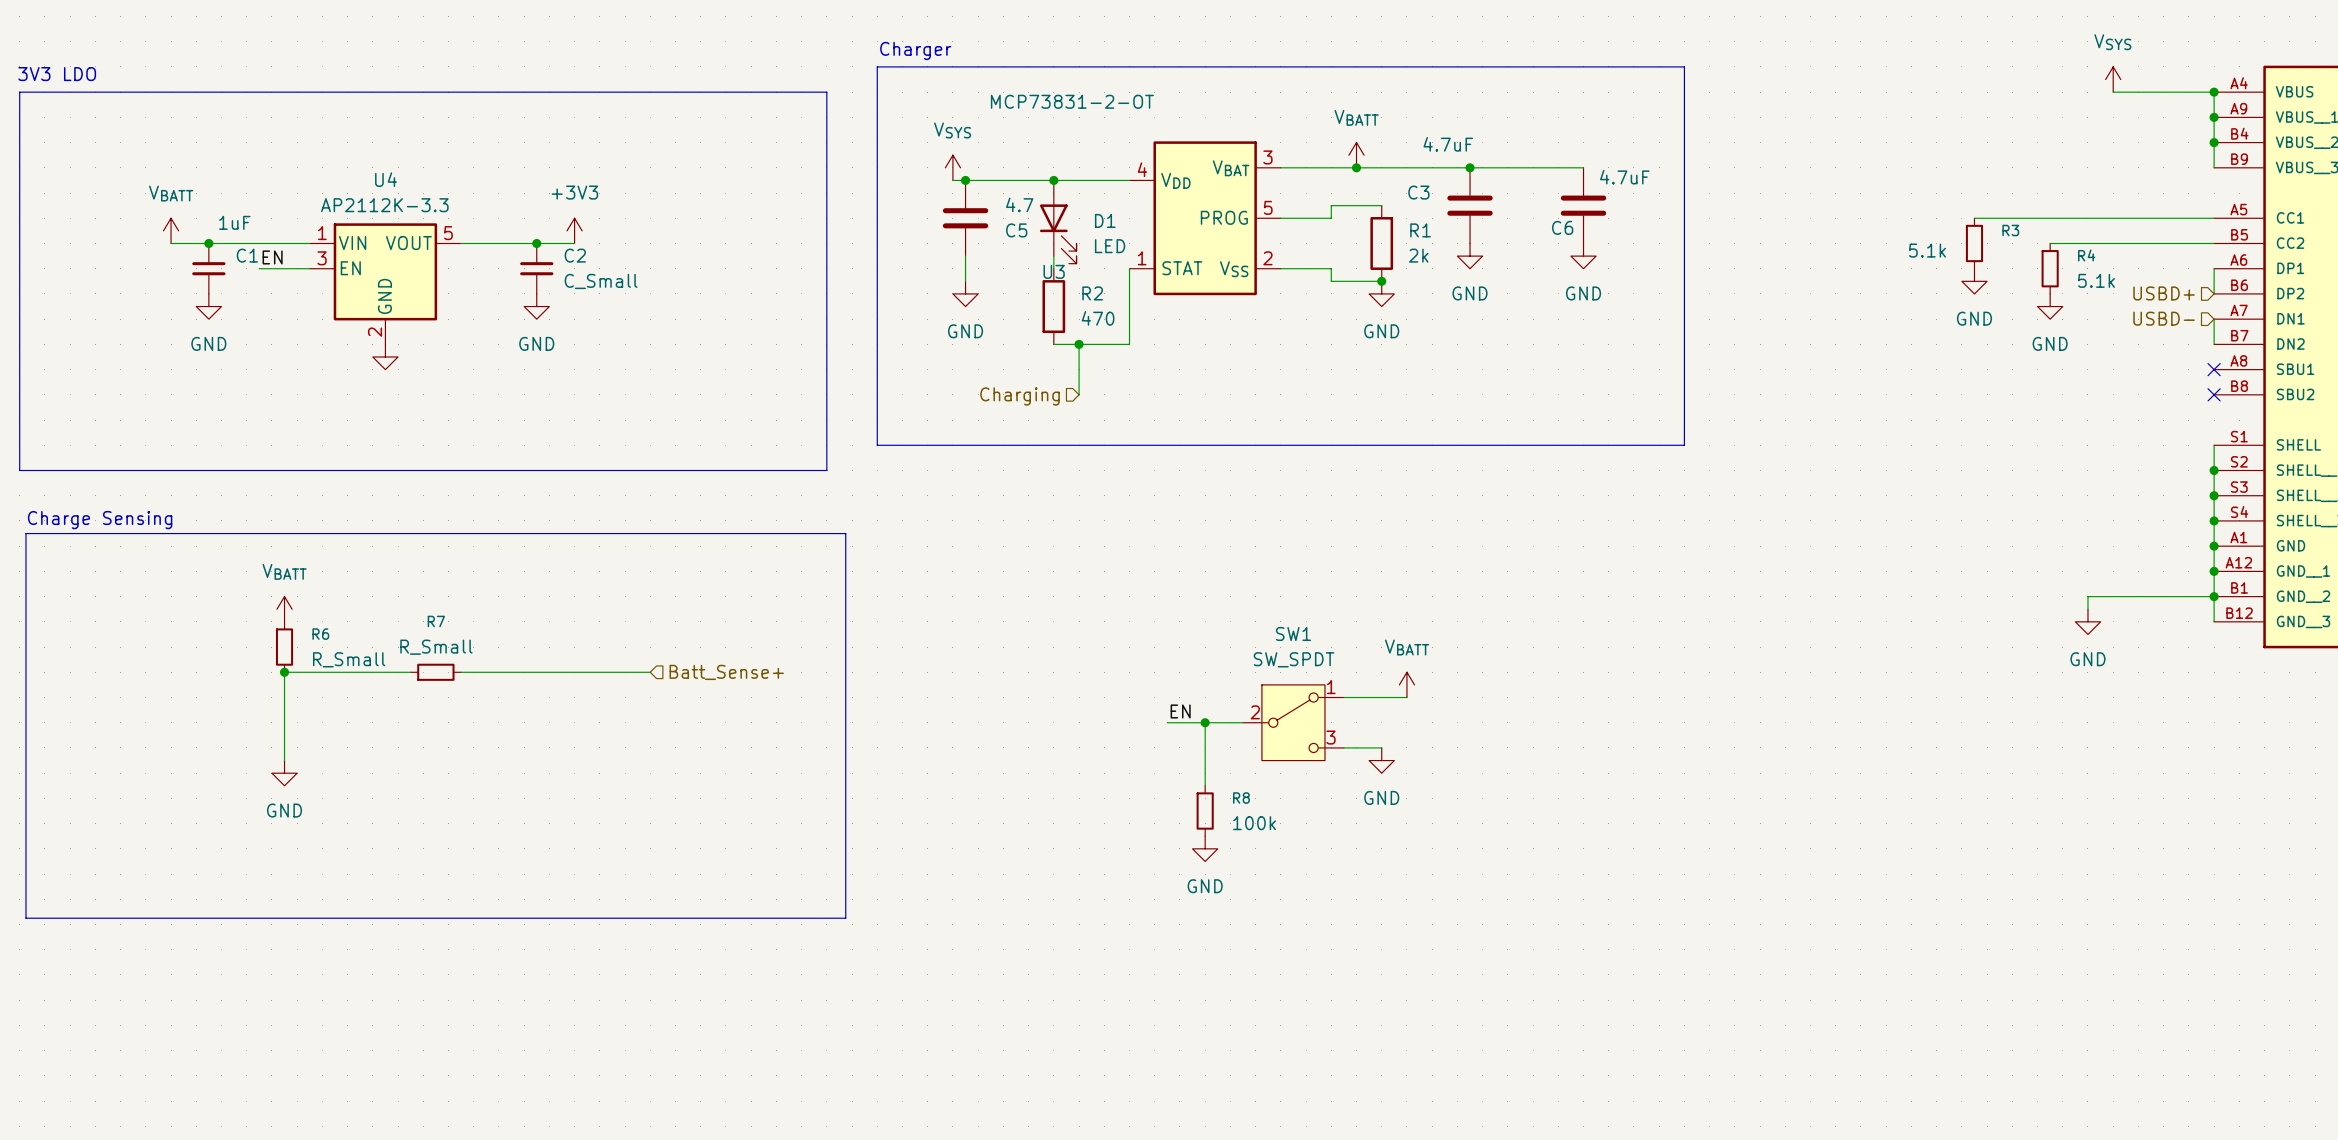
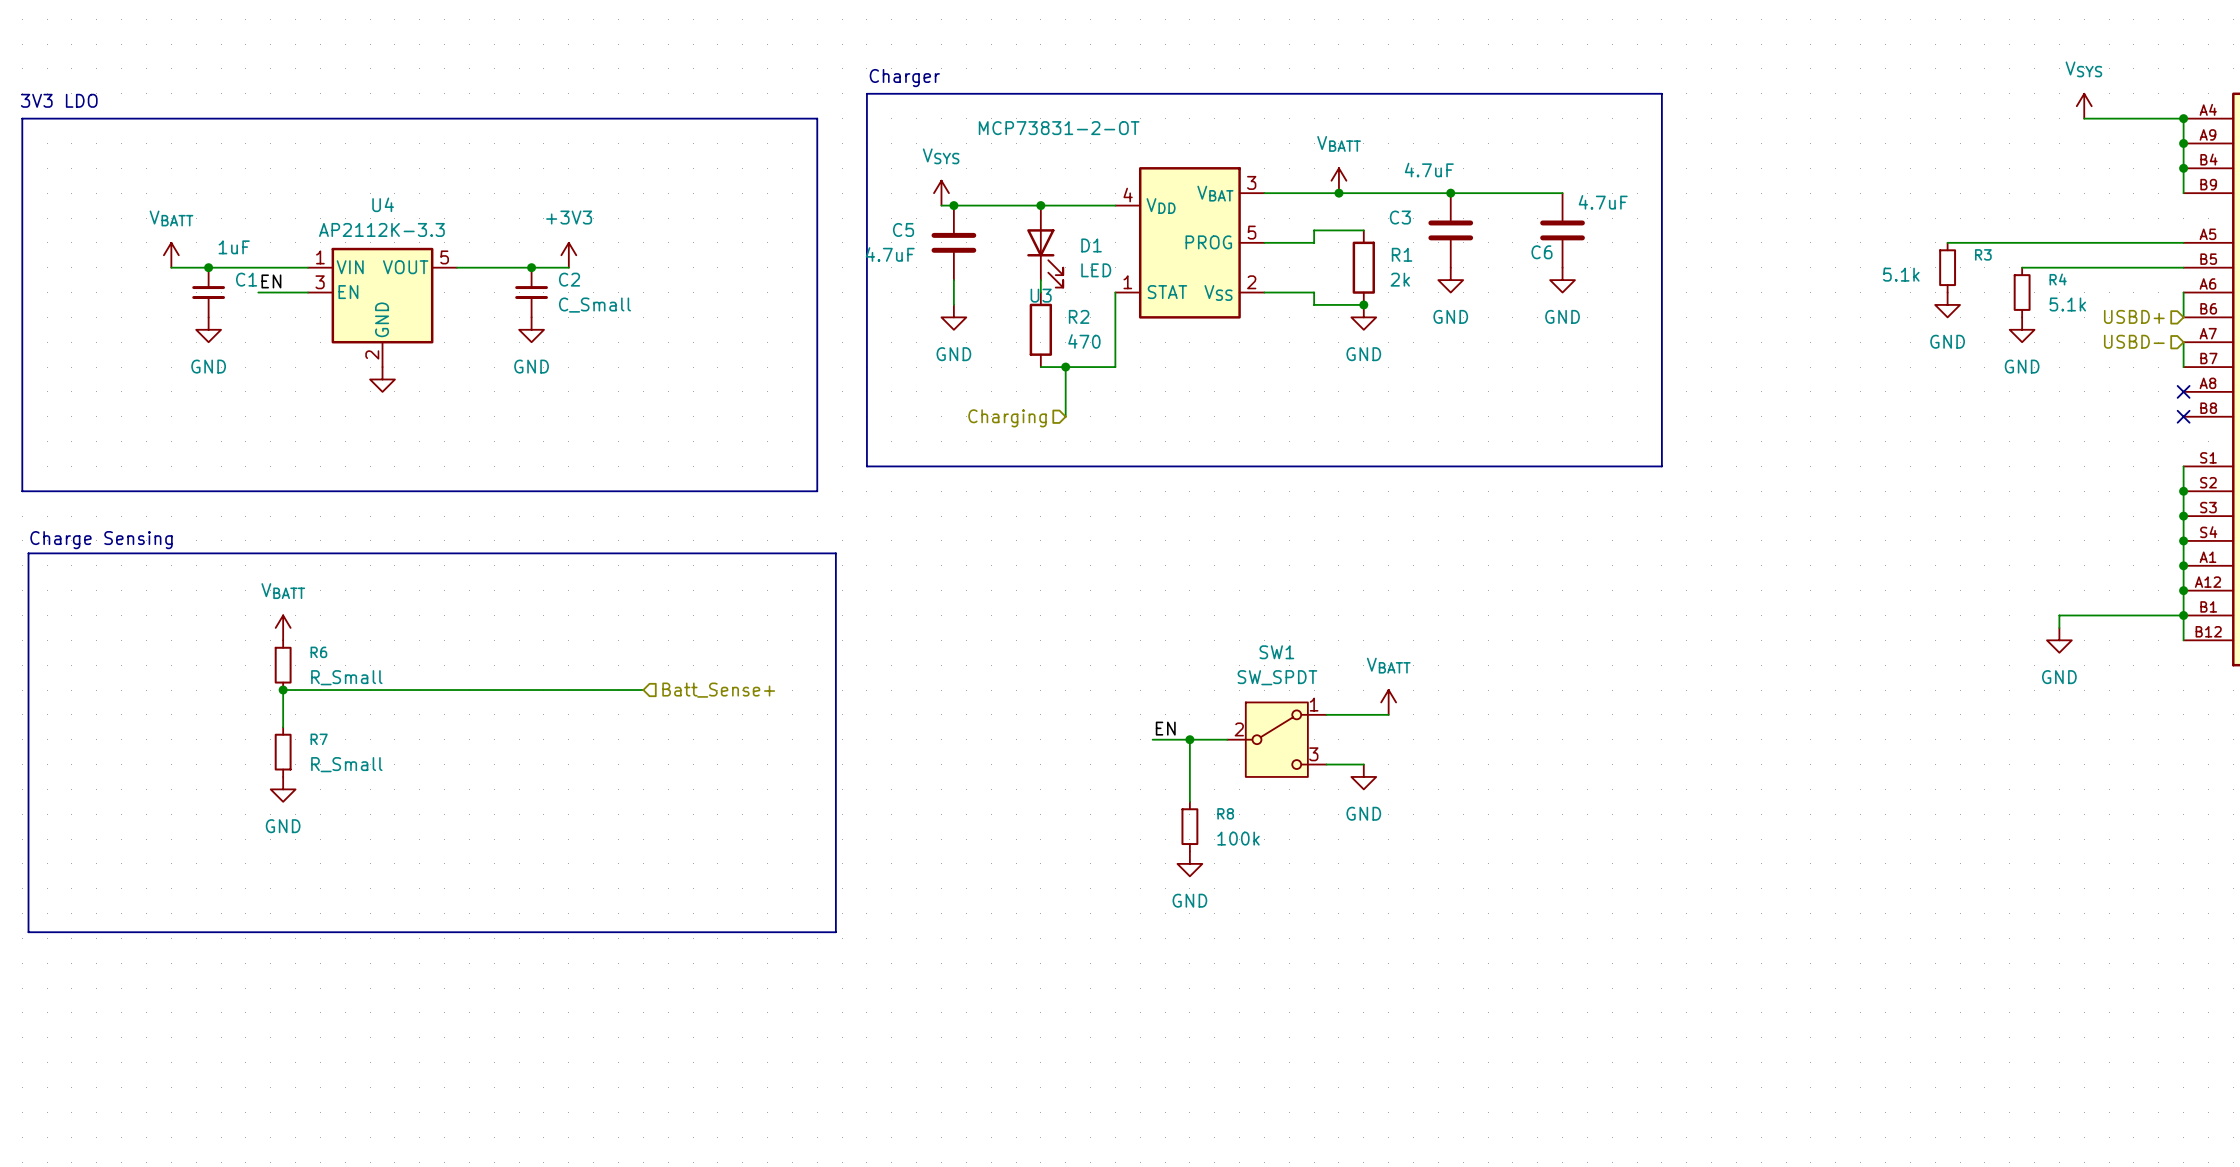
C5 value: 4.7 (1019, 204) -> 4.7uF (890, 254)
C5 name position: C5 (1016, 230) -> C5 (903, 229)
R7 value position: R_Small (436, 647) -> R_Small (346, 764)
wire: none -> (407, 690) (457, 690)
R7 rotation: 0° (435, 672) -> 90° clockwise (283, 752)
R7 position: (435, 672) -> (283, 752)
wire: (284, 710) (284, 760) -> none

